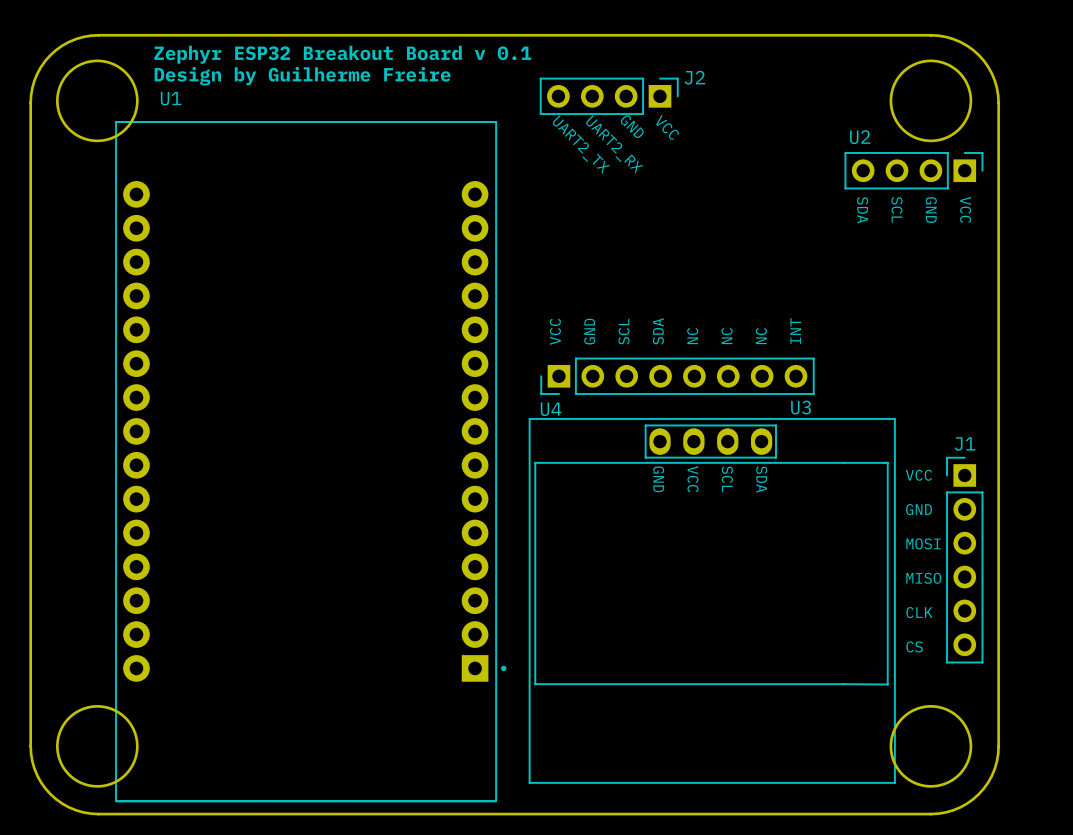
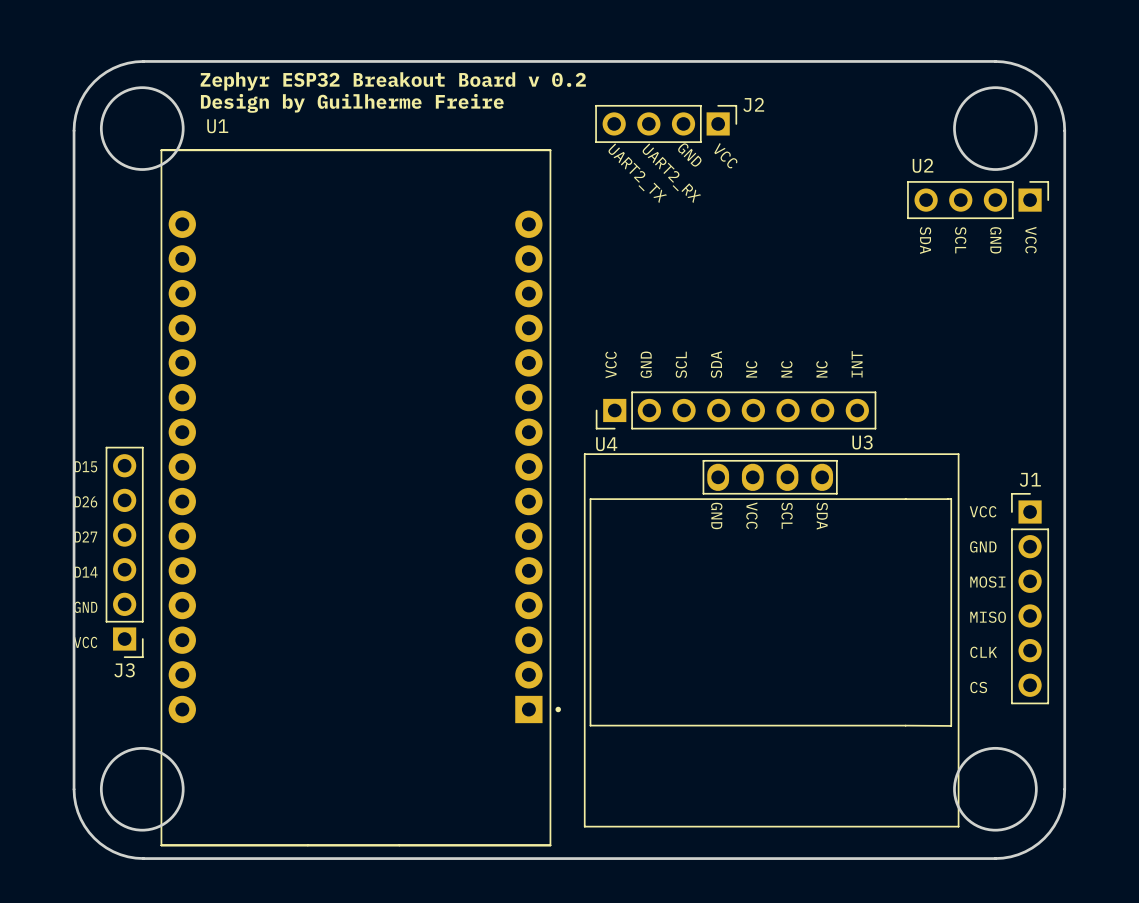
text: Zephyr ESP32 Breakout Board v 0.1 (342, 54) -> Zephyr ESP32 Breakout Board v 0.2 (393, 81)
text: none -> D15 (85, 466)
text: none -> D26 (85, 501)
text: none -> D27 (85, 536)
J3: none -> (124, 552)
text: none -> D14 (86, 572)
text: none -> GND (85, 607)
text: none -> VCC (85, 642)

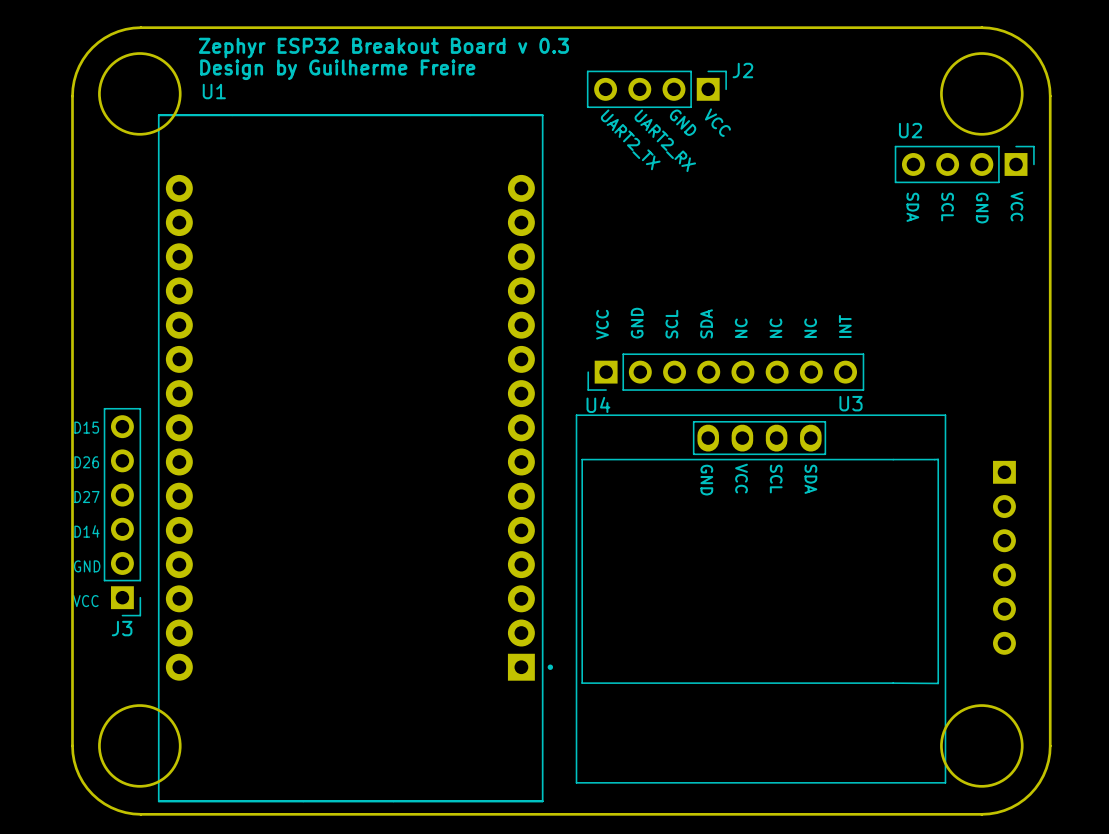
text: Zephyr ESP32 Breakout Board v 0.2 (393, 81) -> Zephyr ESP32 Breakout Board v 0.3 (383, 48)
text: VCC (983, 511) -> none
text: GND (983, 546) -> none
text: MOSI (987, 582) -> none
J1 side: top (1030, 598) -> bottom (1004, 557)
text: MISO (988, 617) -> none
text: CLK (983, 652) -> none
text: CS (978, 687) -> none

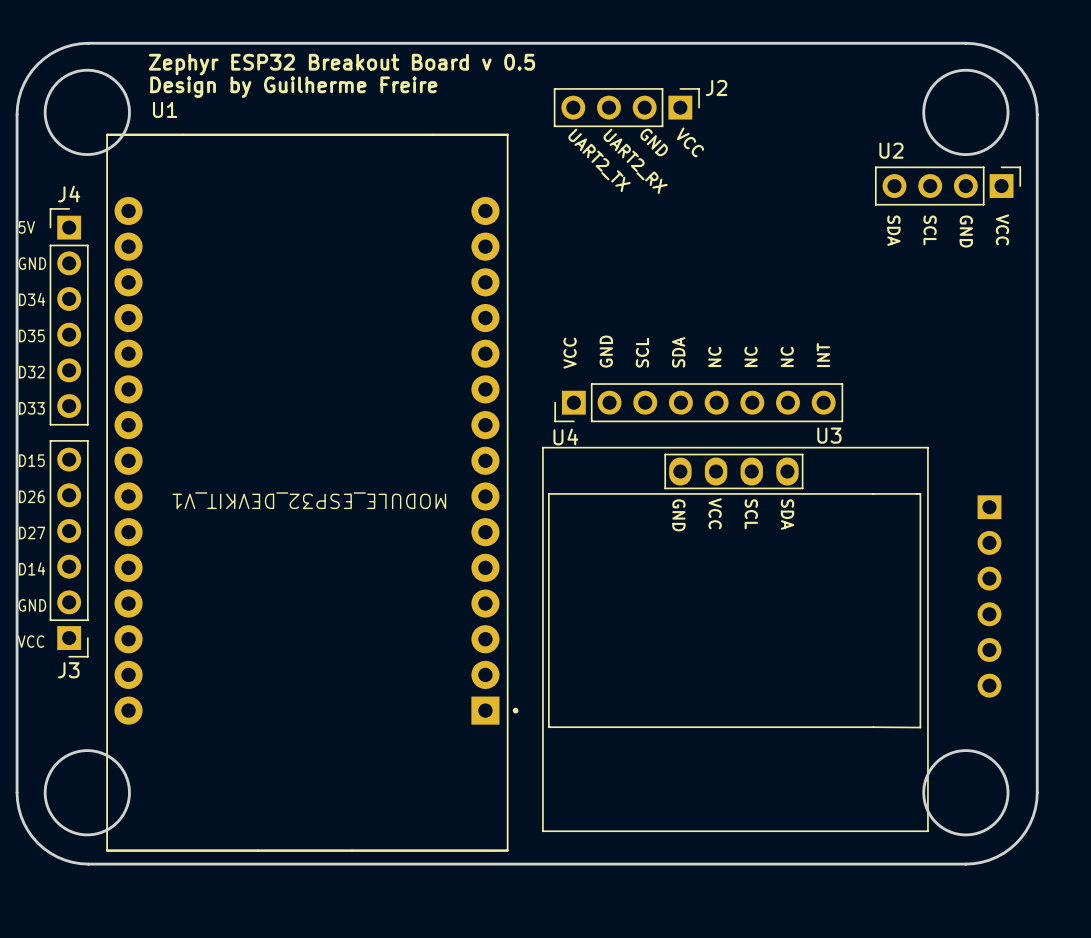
text: Zephyr ESP32 Breakout Board v 0.3 (383, 48) -> Zephyr ESP32 Breakout Board v 0.5 (341, 64)
text: none -> 5V (26, 227)
text: none -> GND (32, 263)
text: none -> D34 (32, 299)
J4: none -> (69, 316)
text: none -> D35 (31, 335)
text: none -> D32 (31, 372)
text: none -> D33 (31, 408)
U1 text: none -> MODULE_ESP32_DEVKIT_V1 (309, 500)

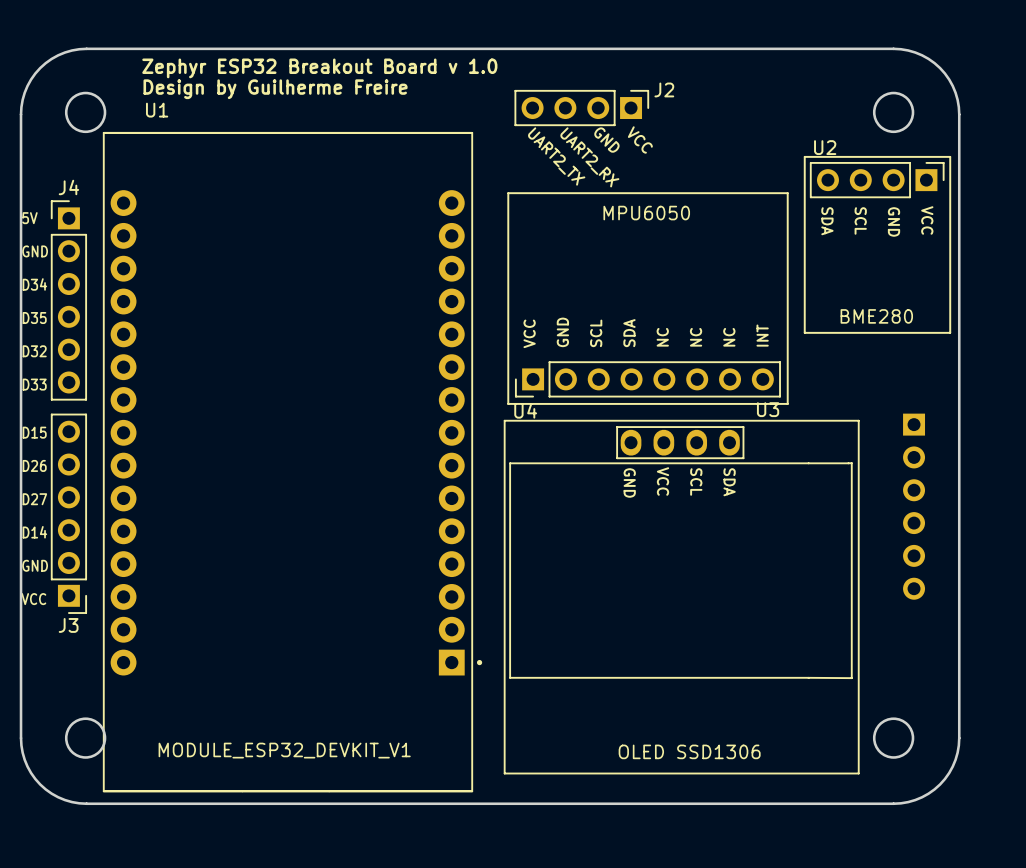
text: Zephyr ESP32 Breakout Board v 0.5 (341, 64) -> Zephyr ESP32 Breakout Board v 1.0 (319, 68)
round board edge size: [43, 68, 131, 156] -> [64, 91, 107, 134]
round board edge size: [922, 68, 1010, 156] -> [872, 91, 915, 134]
line: none -> (804, 156) (950, 156) (950, 332) (804, 332) (804, 156)
line: none -> (508, 193) (787, 193) (787, 403) (508, 403) (508, 193)
text: none -> MPU6050 (646, 213)
text: none -> BME280 (876, 316)
U1 text rotation: 0° (309, 500) -> 180° (284, 750)
part position: (989, 596) -> (914, 506)
round board edge size: [43, 749, 131, 837] -> [64, 717, 107, 759]
round board edge size: [922, 749, 1010, 837] -> [872, 717, 915, 759]
text: none -> OLED SSD1306 (689, 751)

